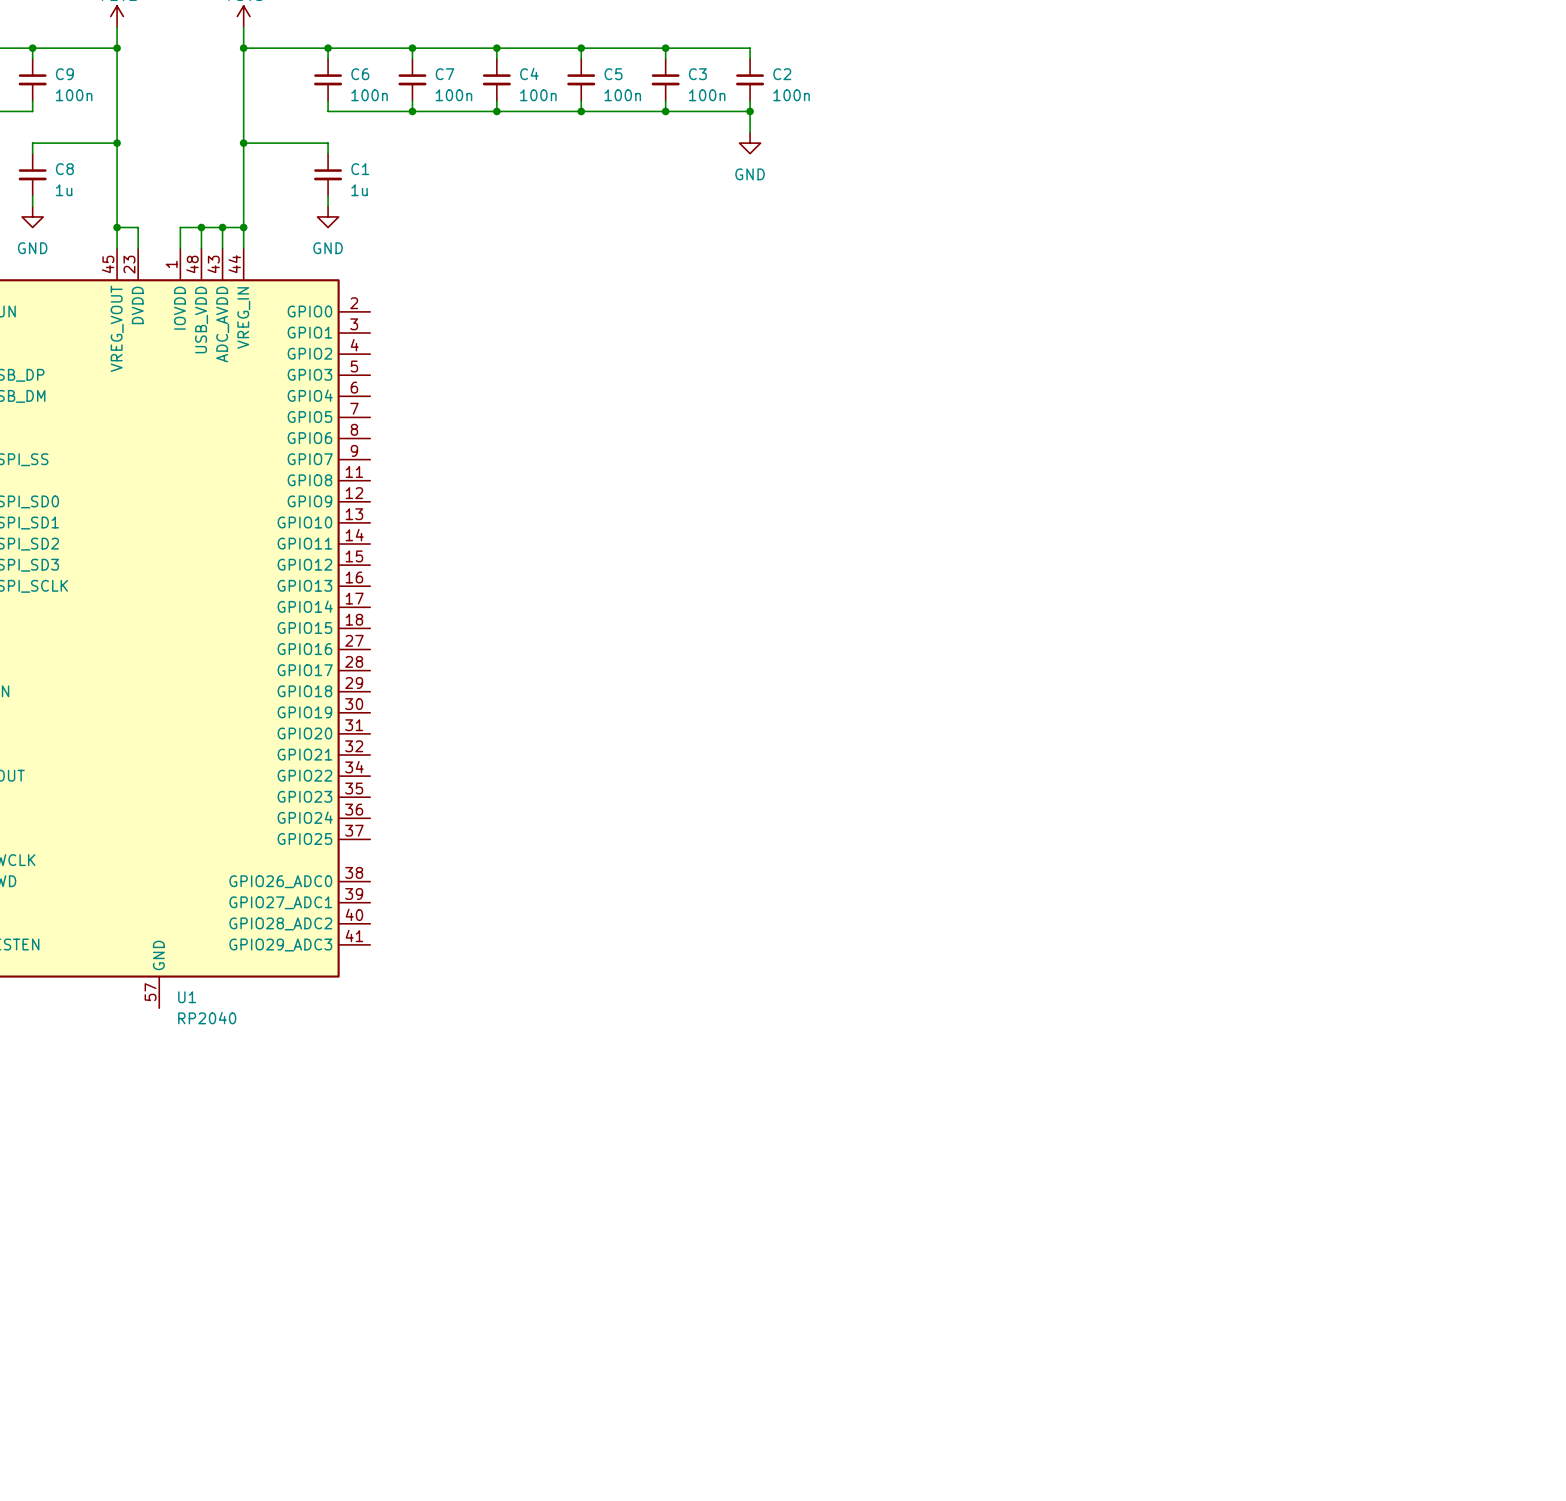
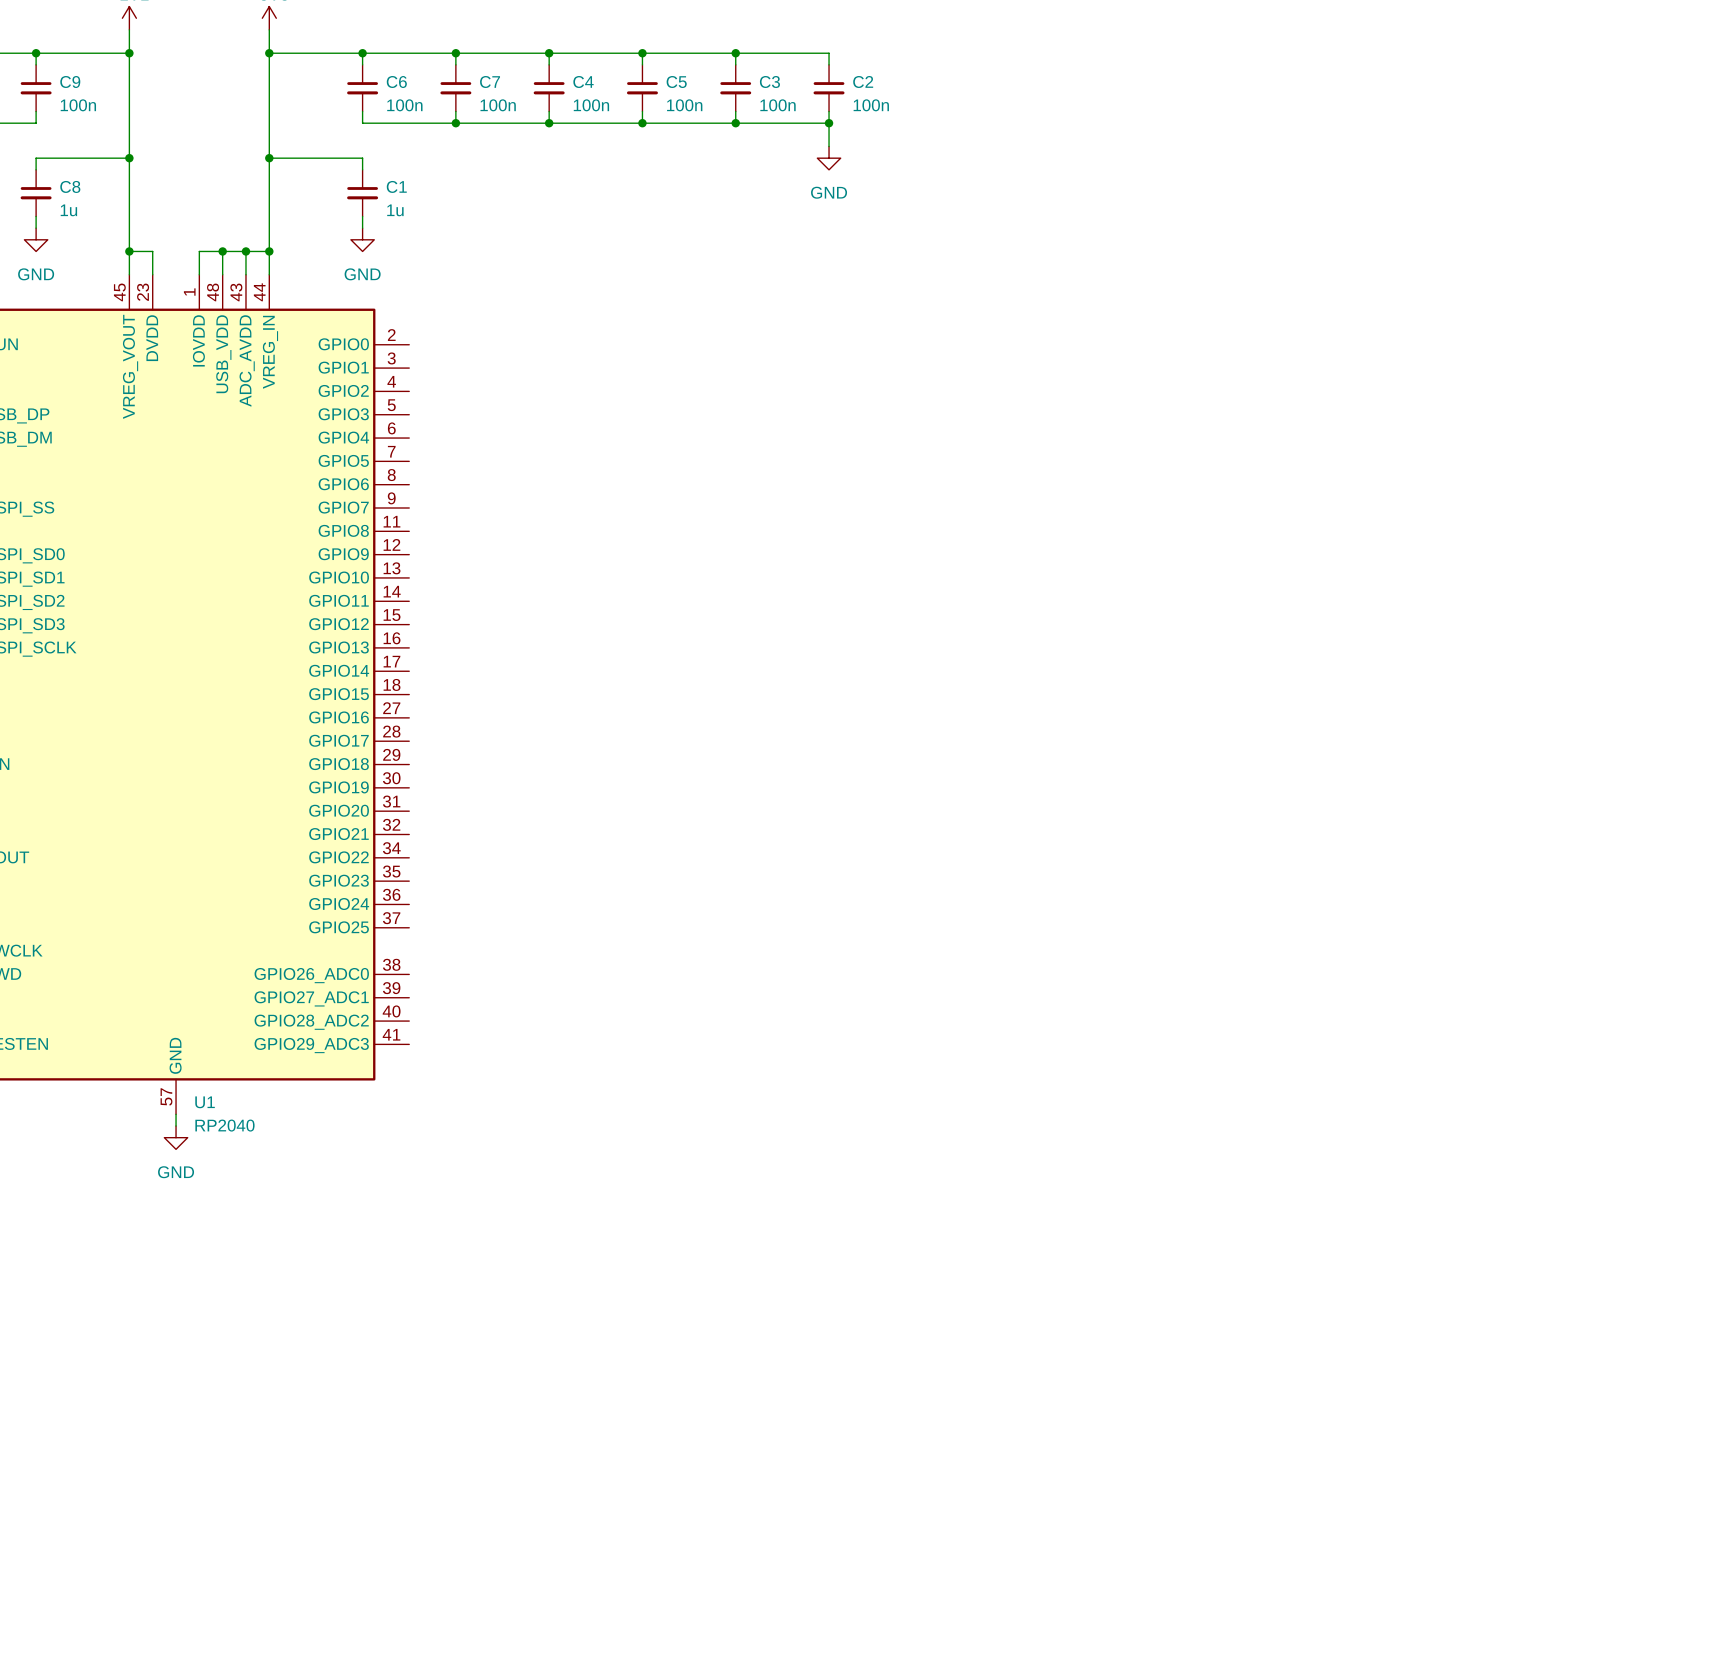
wire: none -> (176, 1114) (176, 1126)
power symbol: none -> GND (176, 1137)

